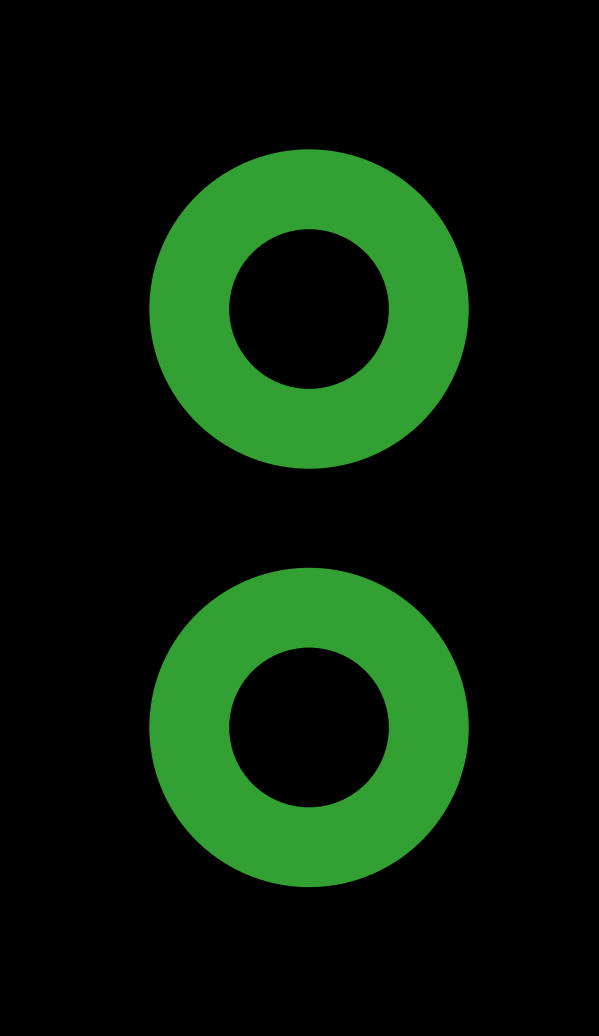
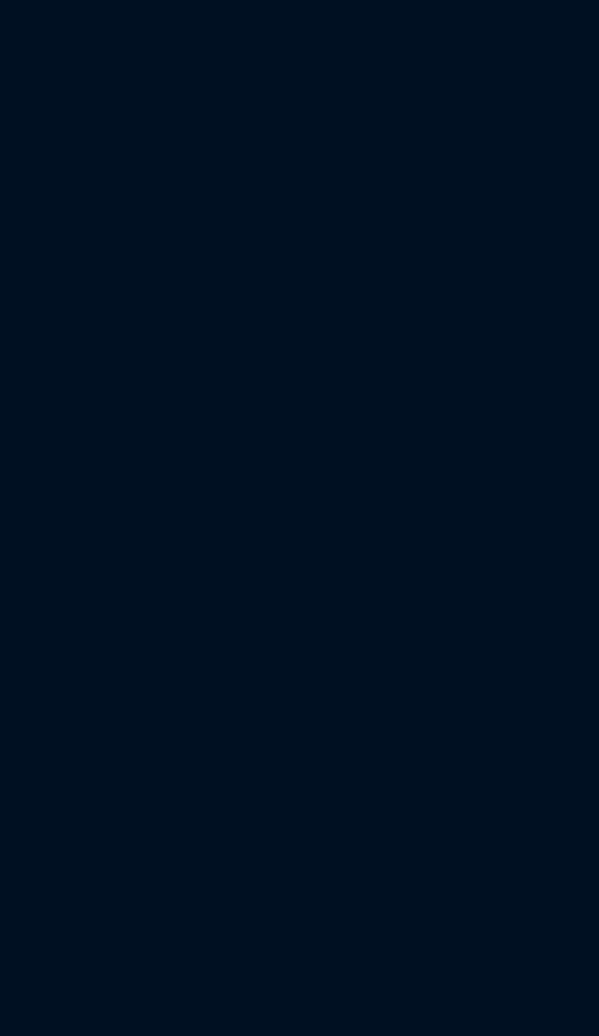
part: (309, 309) -> none
part: (309, 727) -> none

